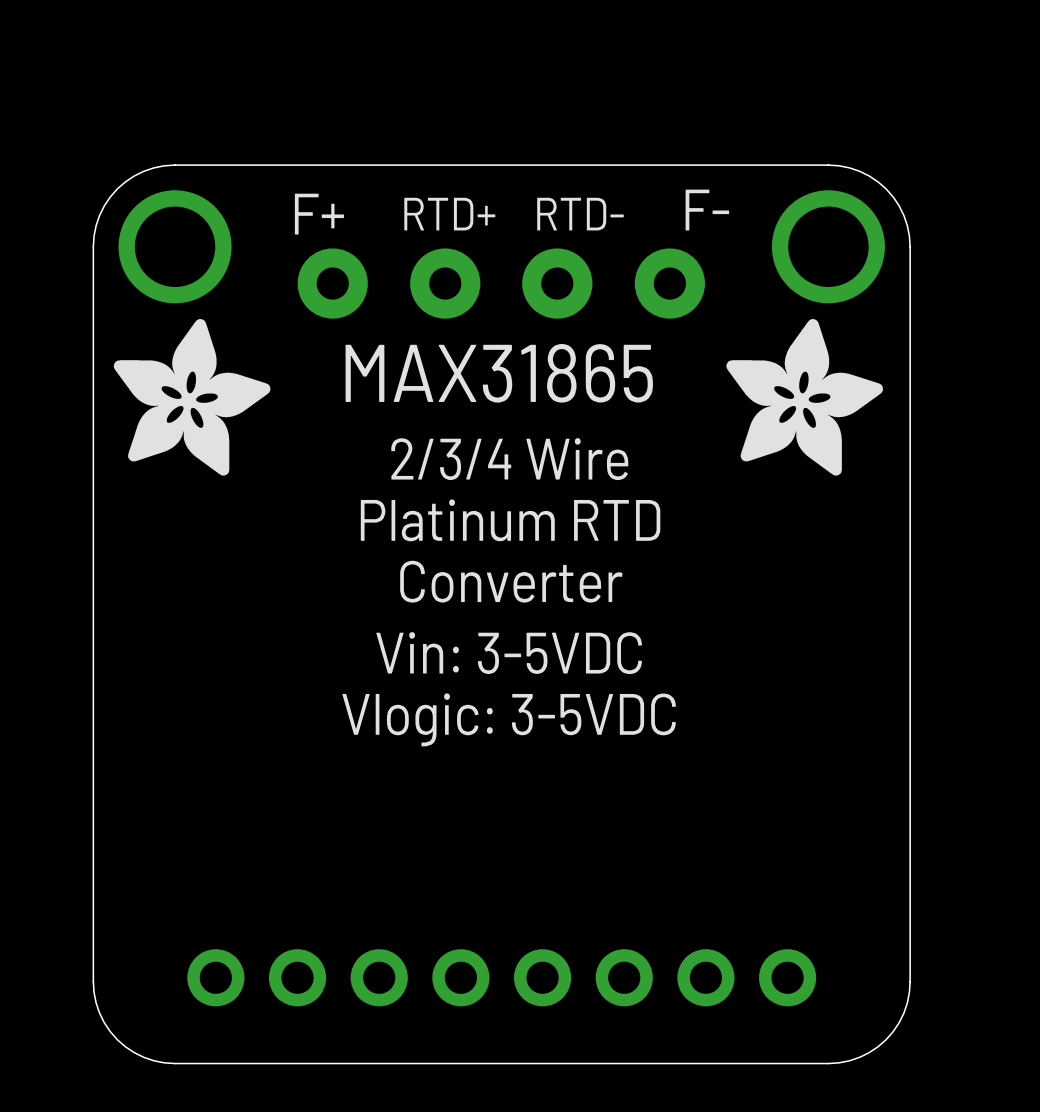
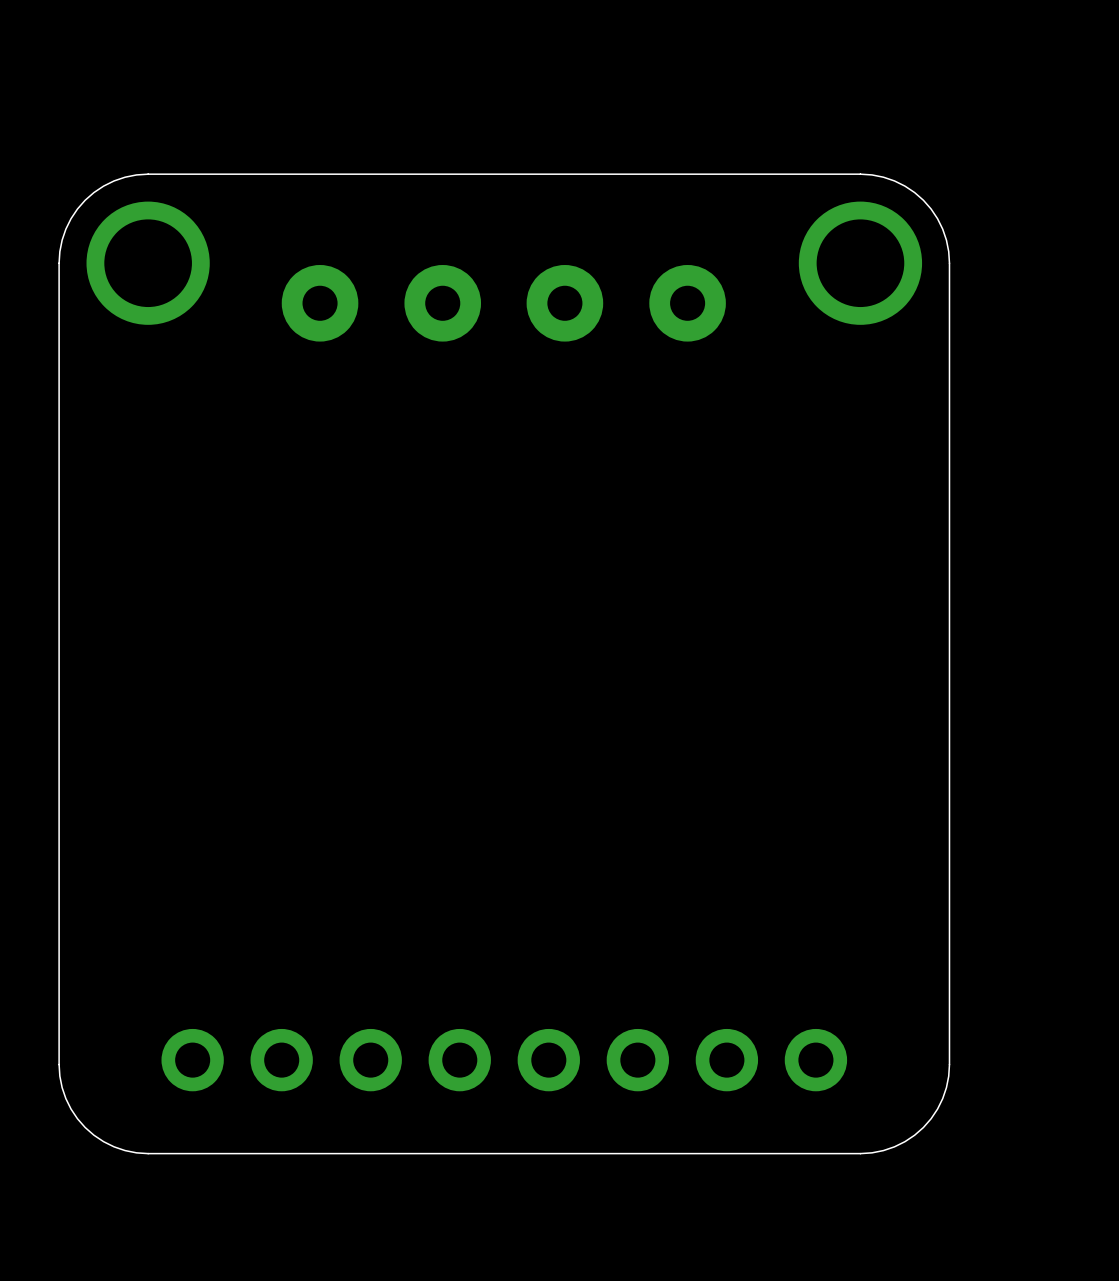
text: F- (707, 210) -> none
text: F+ (319, 214) -> none
text: RTD+ (449, 214) -> none
text: RTD- (580, 214) -> none
drawing: [113, 319, 271, 476] -> none
drawing: [726, 319, 884, 476] -> none
text: MAX31865 (499, 373) -> none
text: 2/3/4 Wire (509, 459) -> none
text: Platinum RTD (510, 520) -> none
text: Converter (511, 581) -> none
text: Vin: 3-5VDC (509, 653) -> none
text: Vlogic: 3-5VDC (509, 719) -> none

